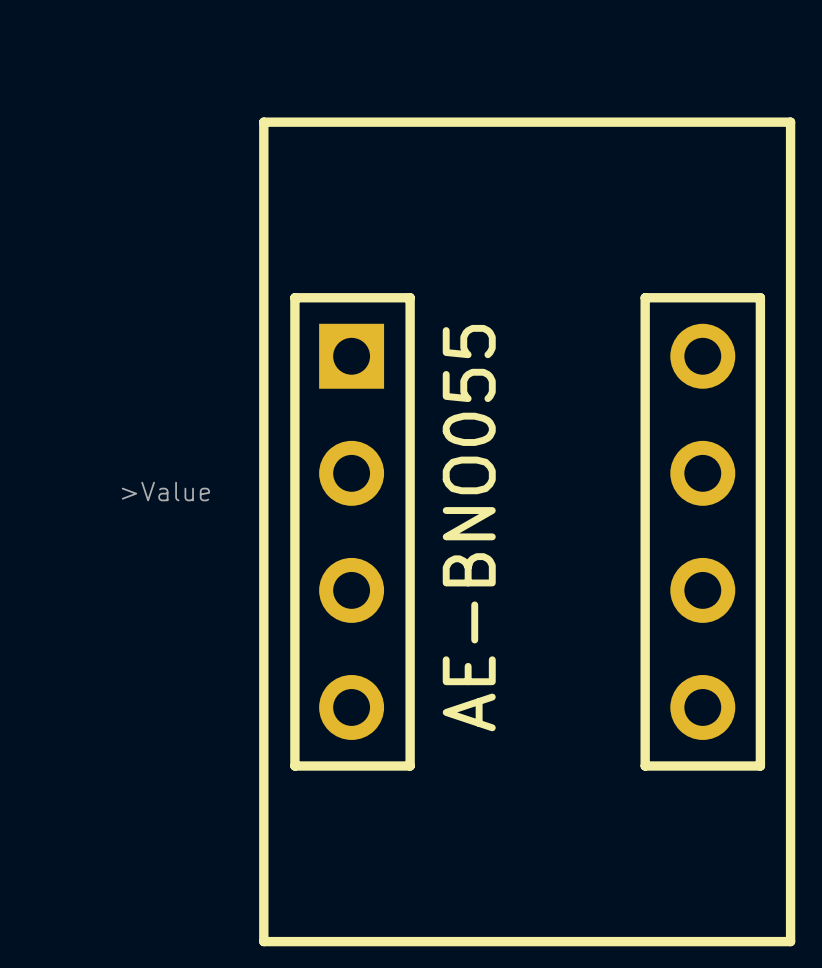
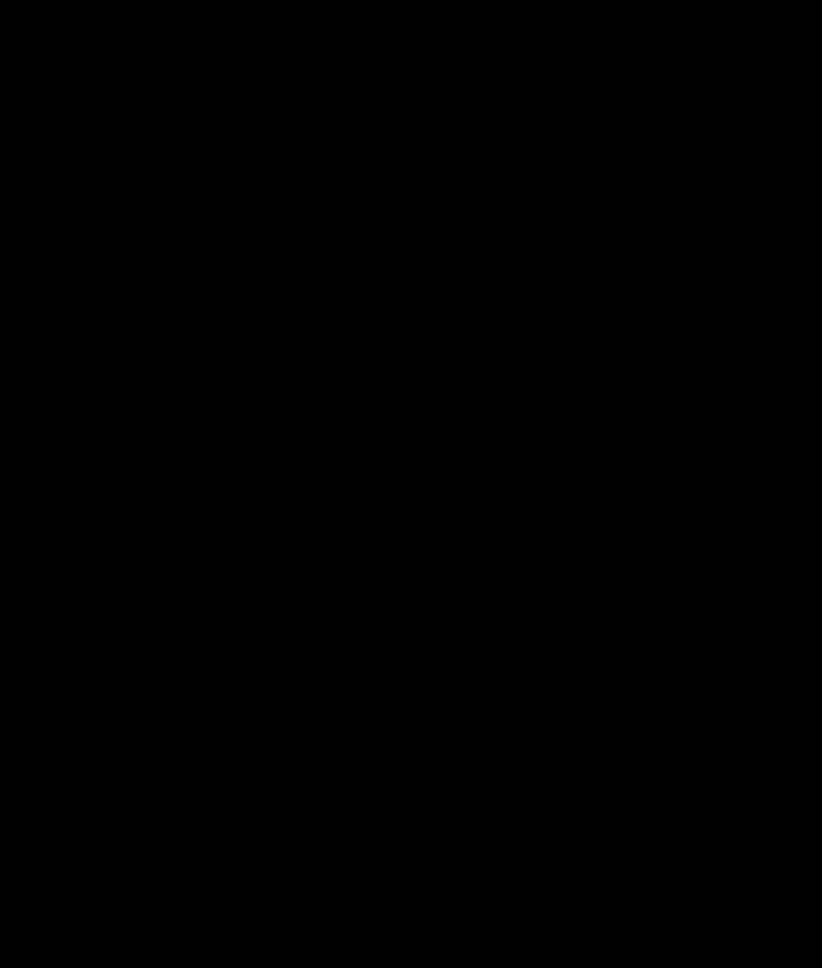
part: (527, 531) -> none

